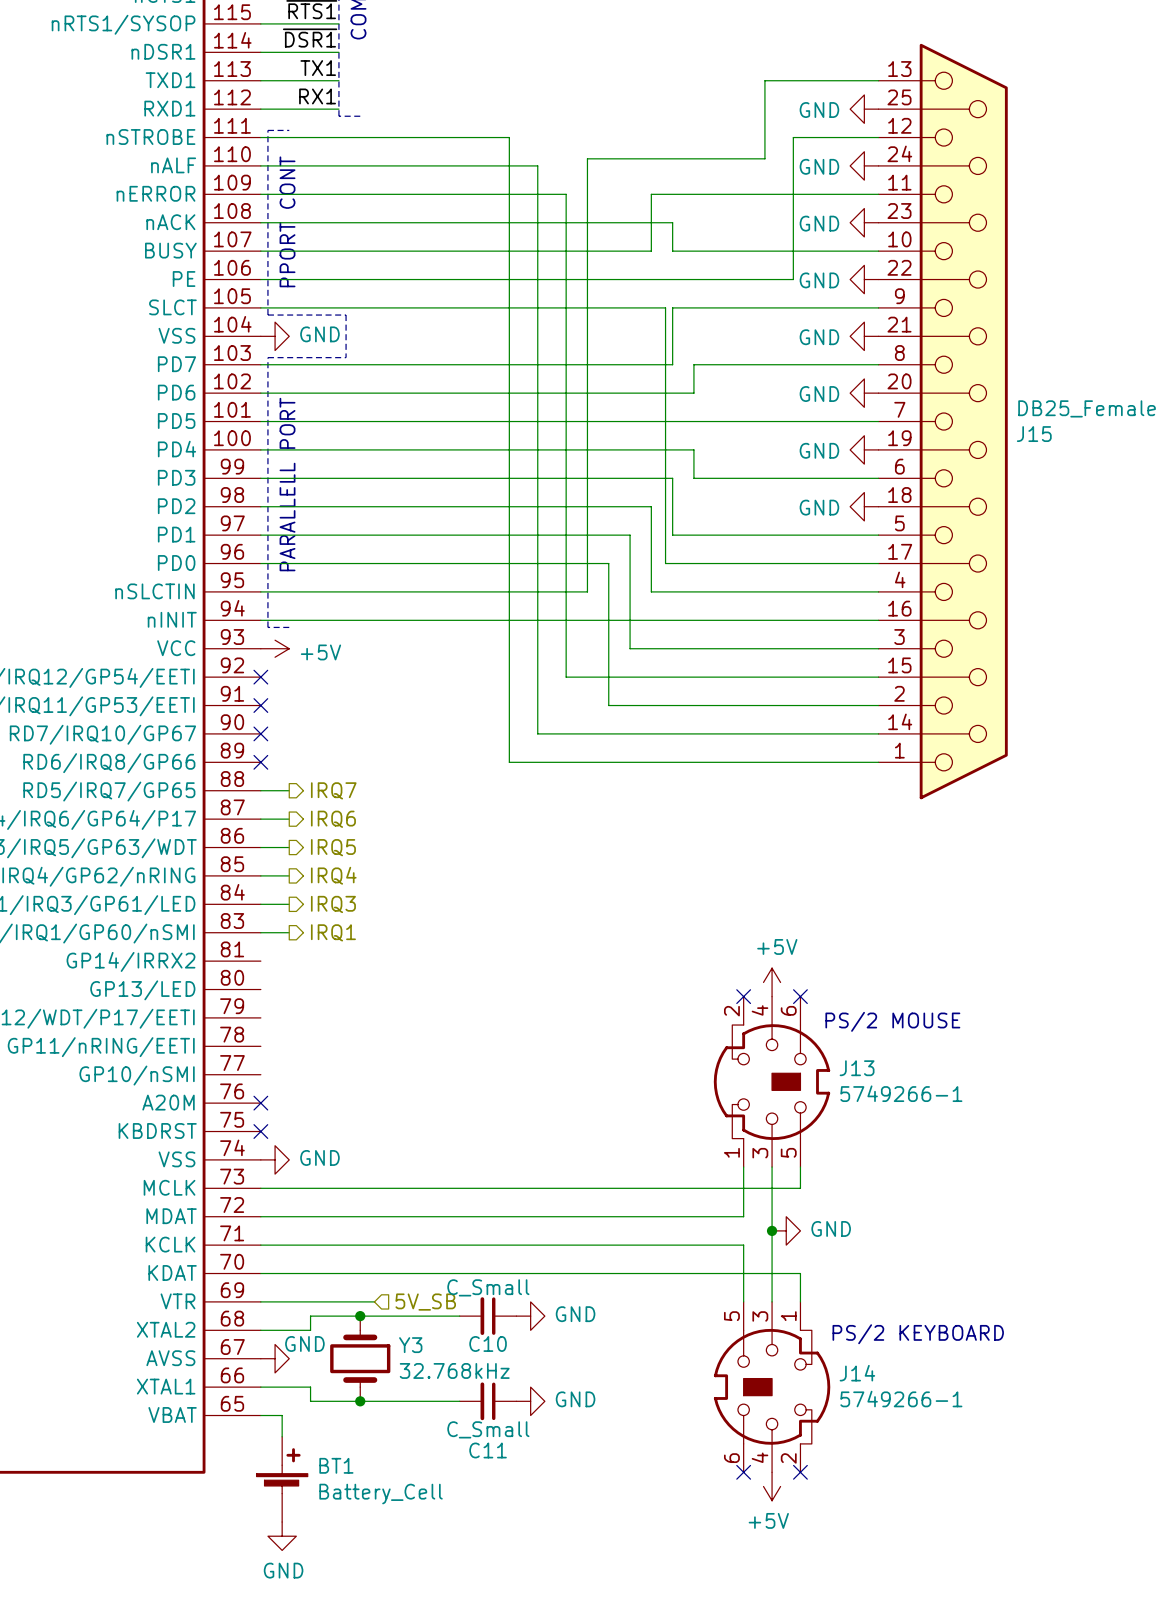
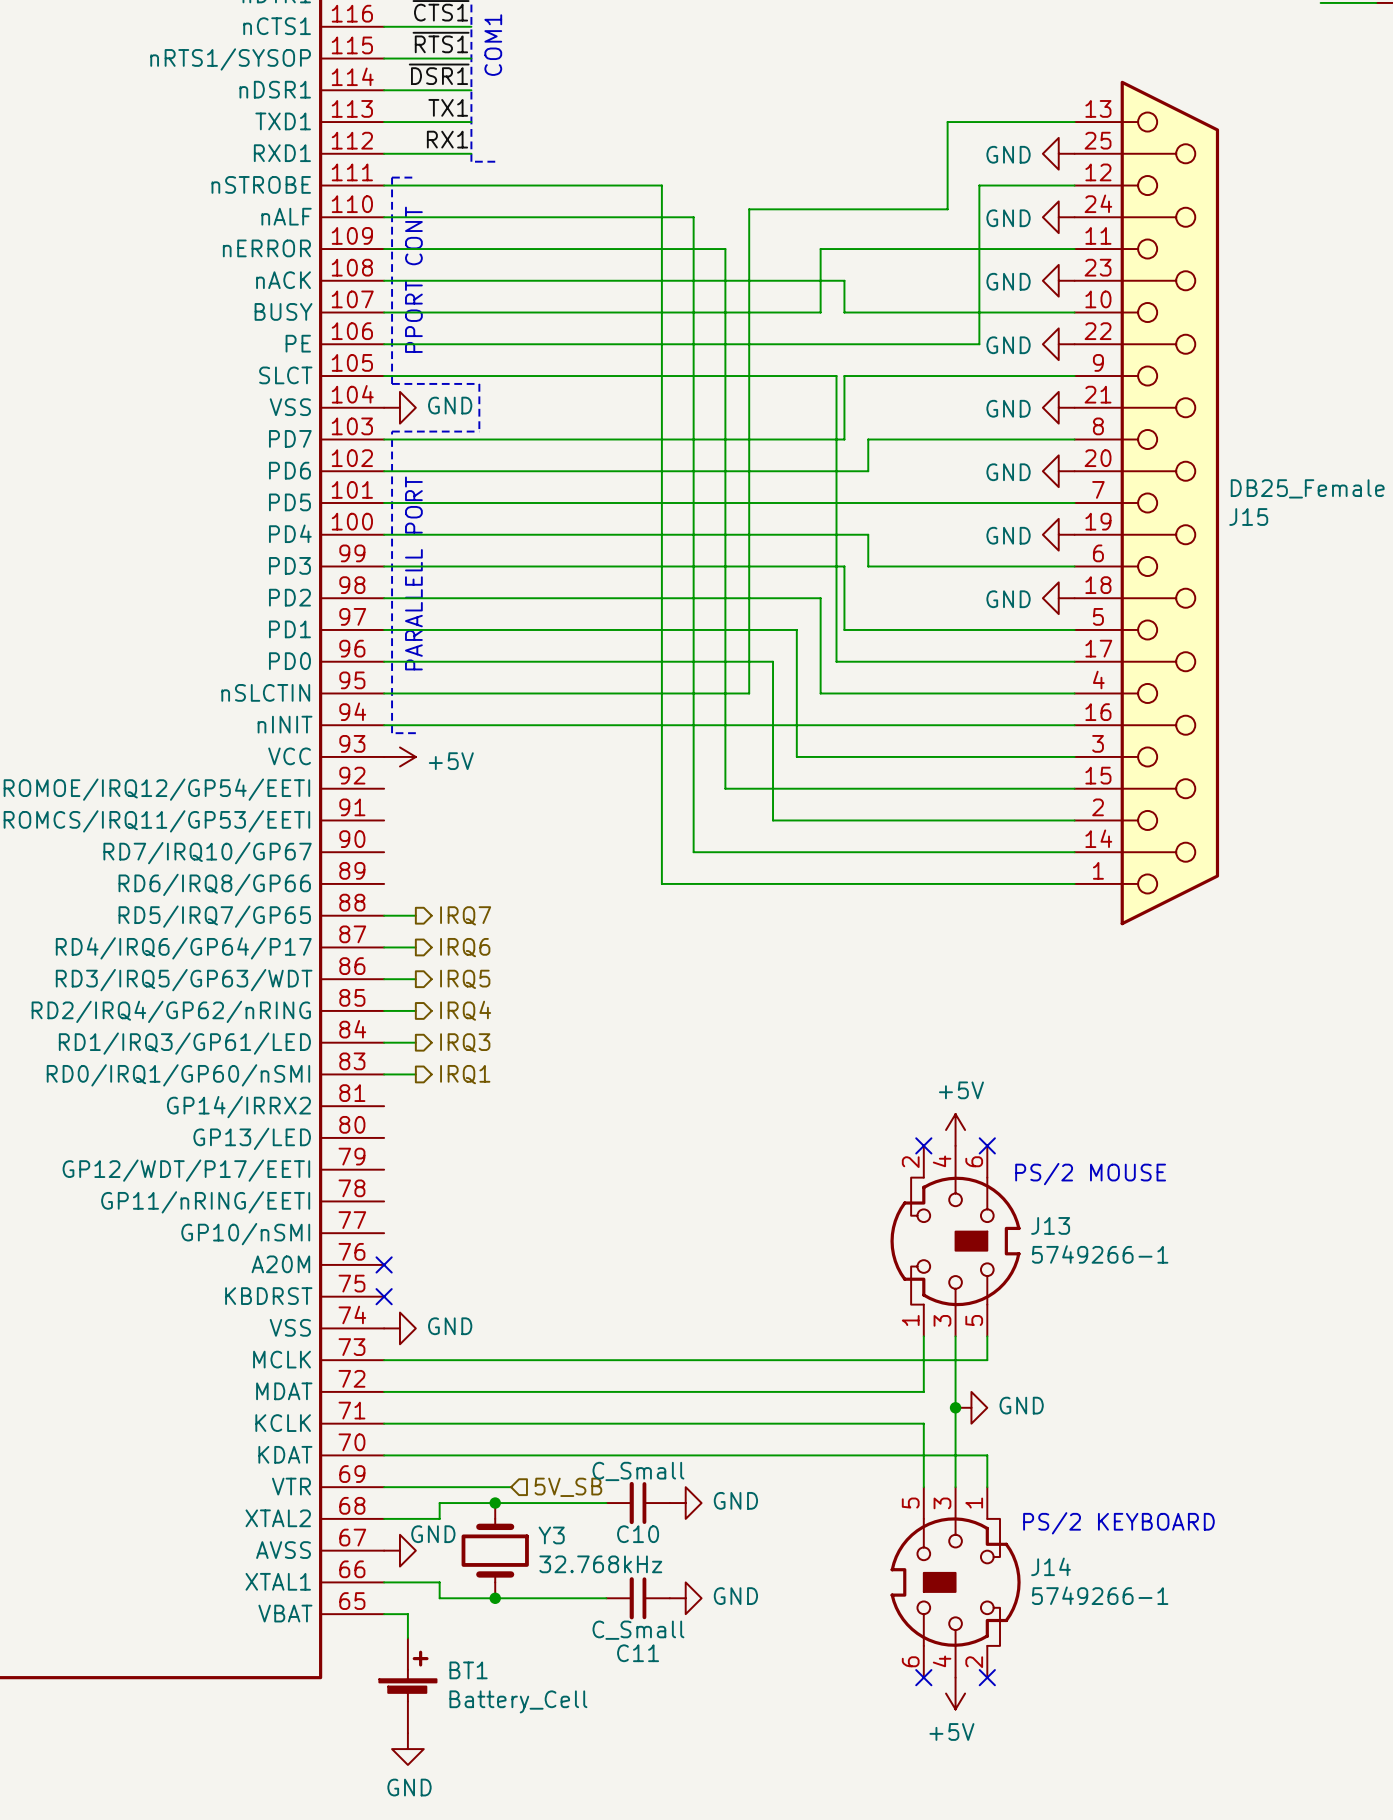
no-connect mark: (260, 677) -> none
no-connect mark: (260, 705) -> none
no-connect mark: (260, 733) -> none
no-connect mark: (260, 762) -> none

